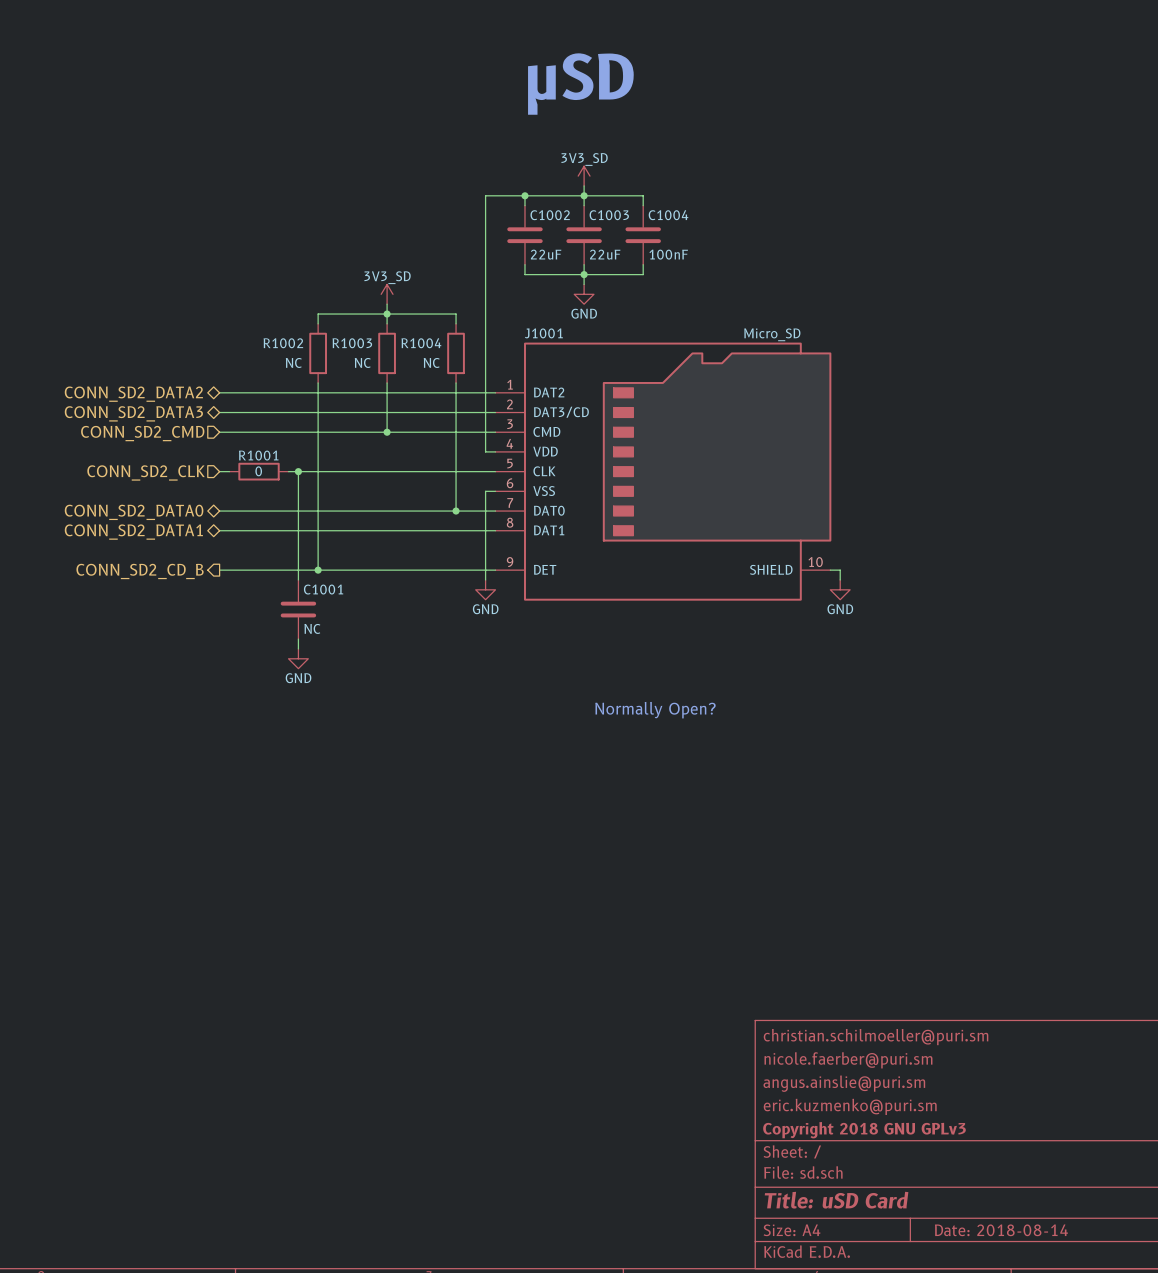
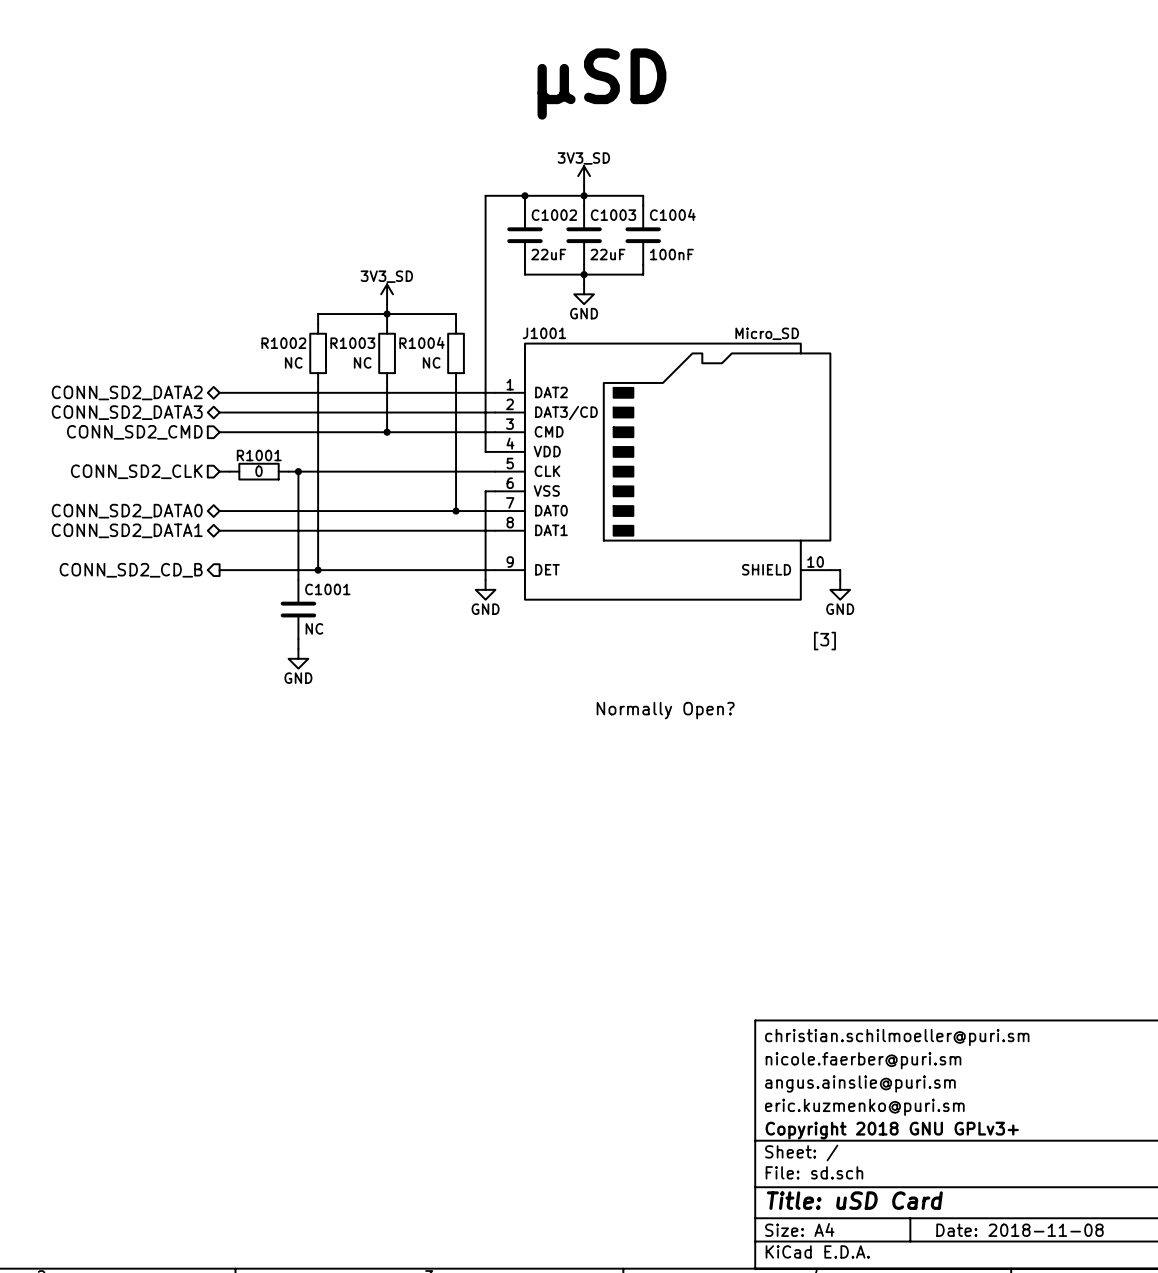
text: none -> [3] (824, 641)
title block: Copyright 2018 GNU GPLv3 (864, 1130) -> Copyright 2018 GNU GPLv3+ (892, 1130)
title block: Date: 2018-08-14 (1001, 1230) -> Date: 2018-11-08 (1020, 1230)

